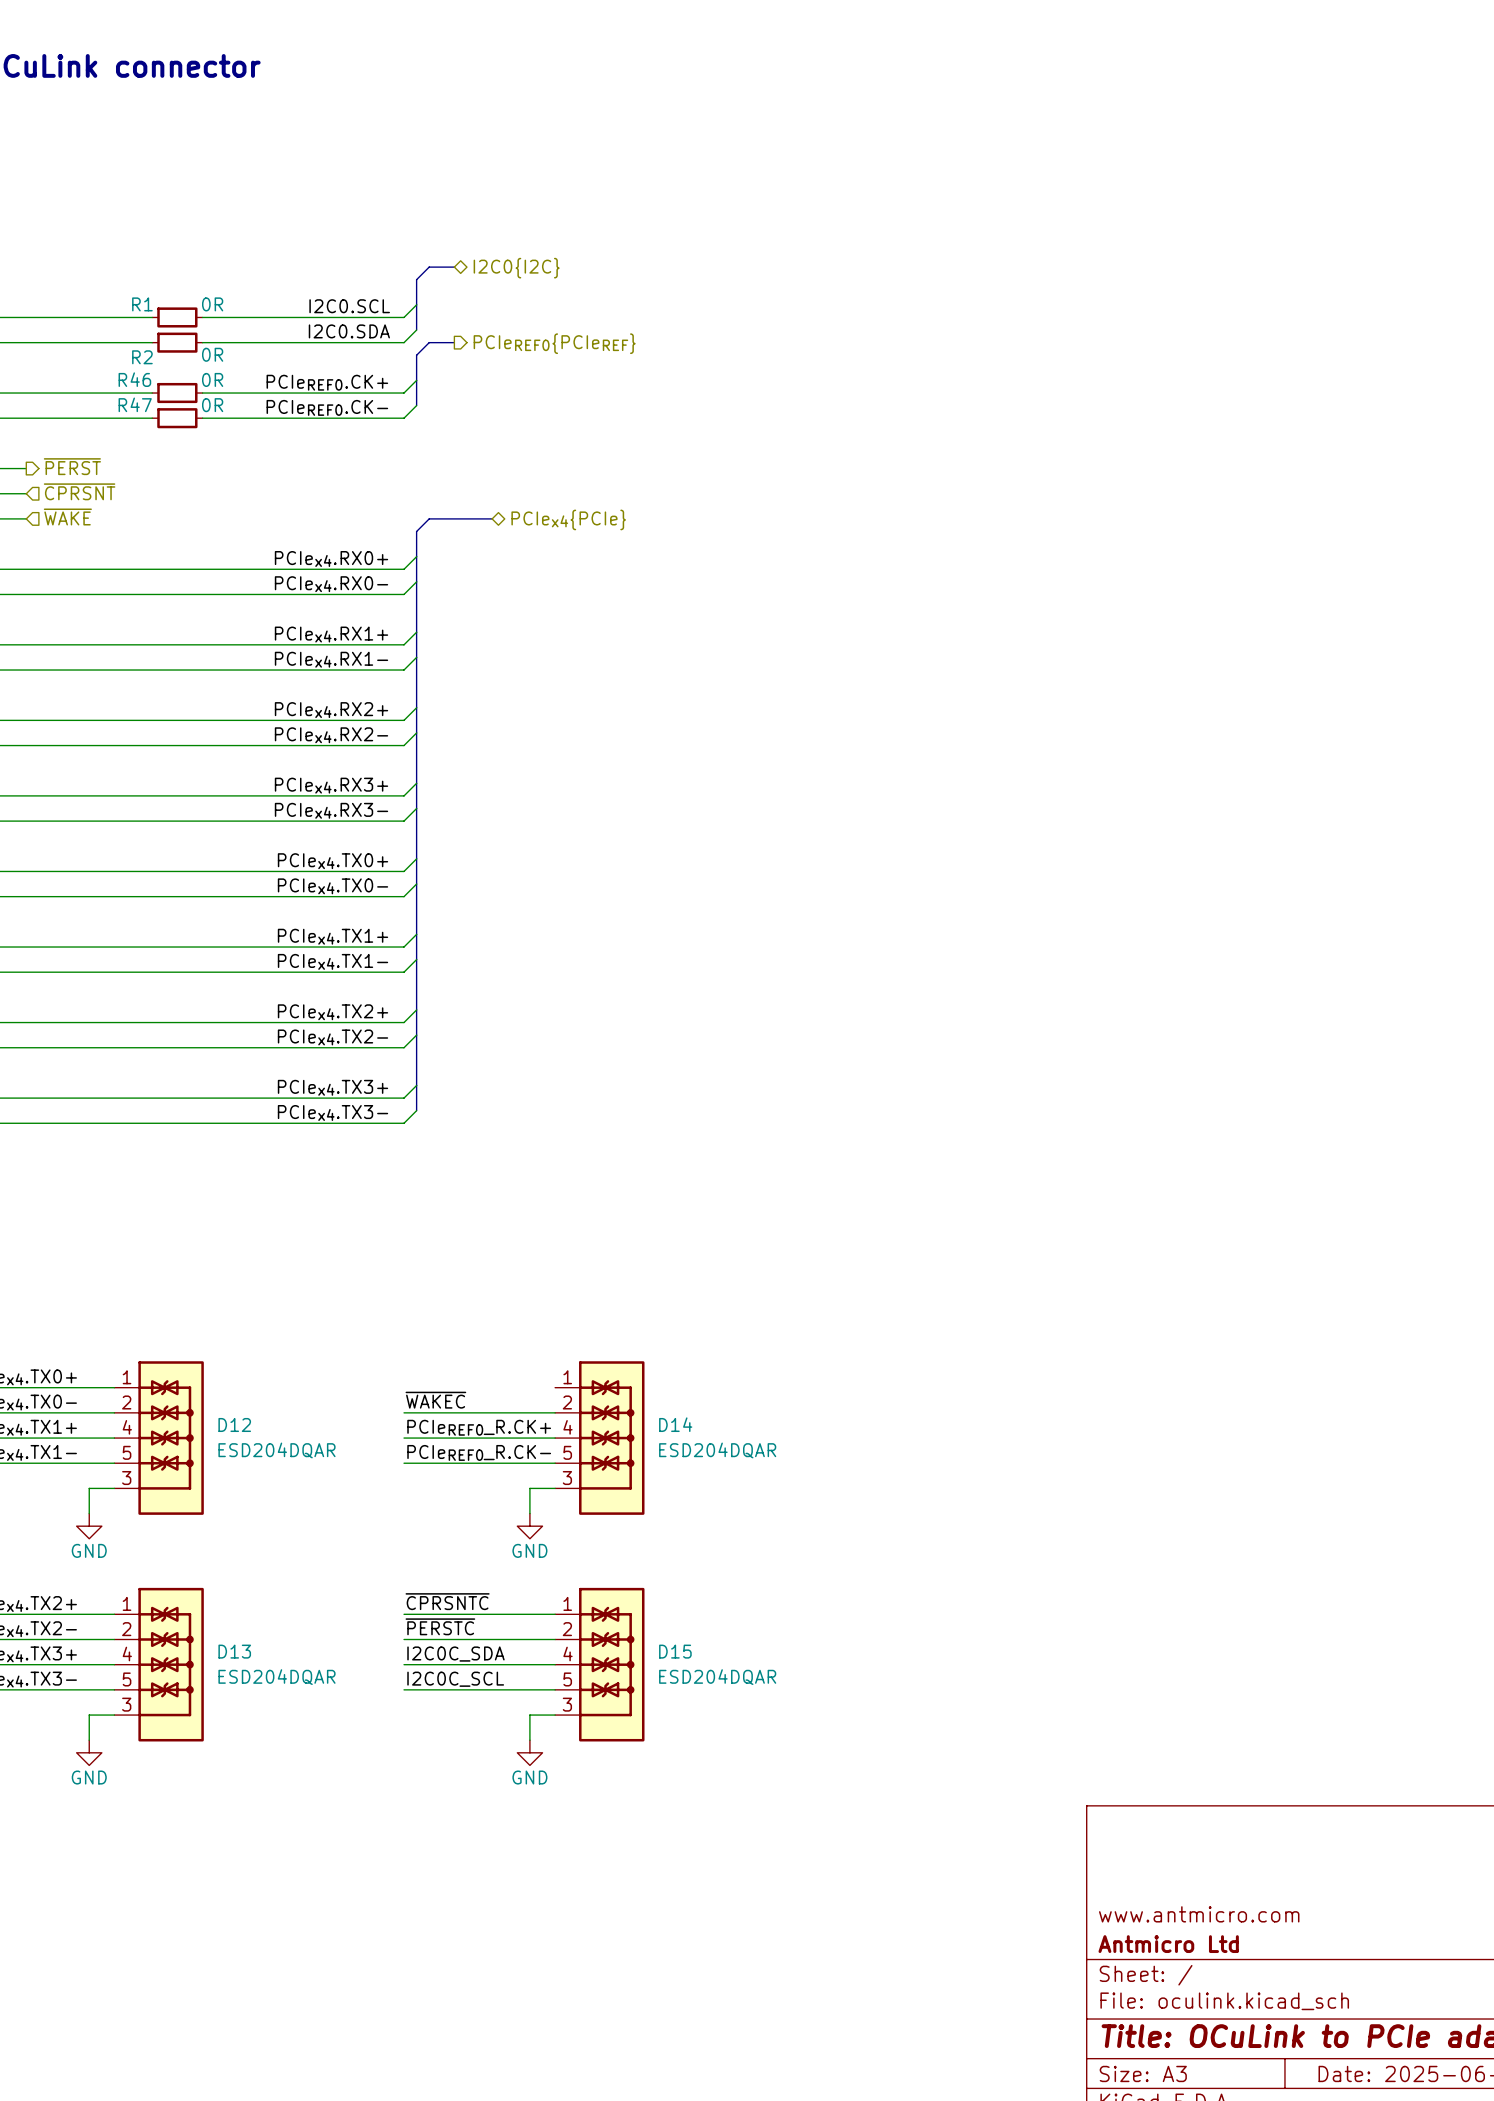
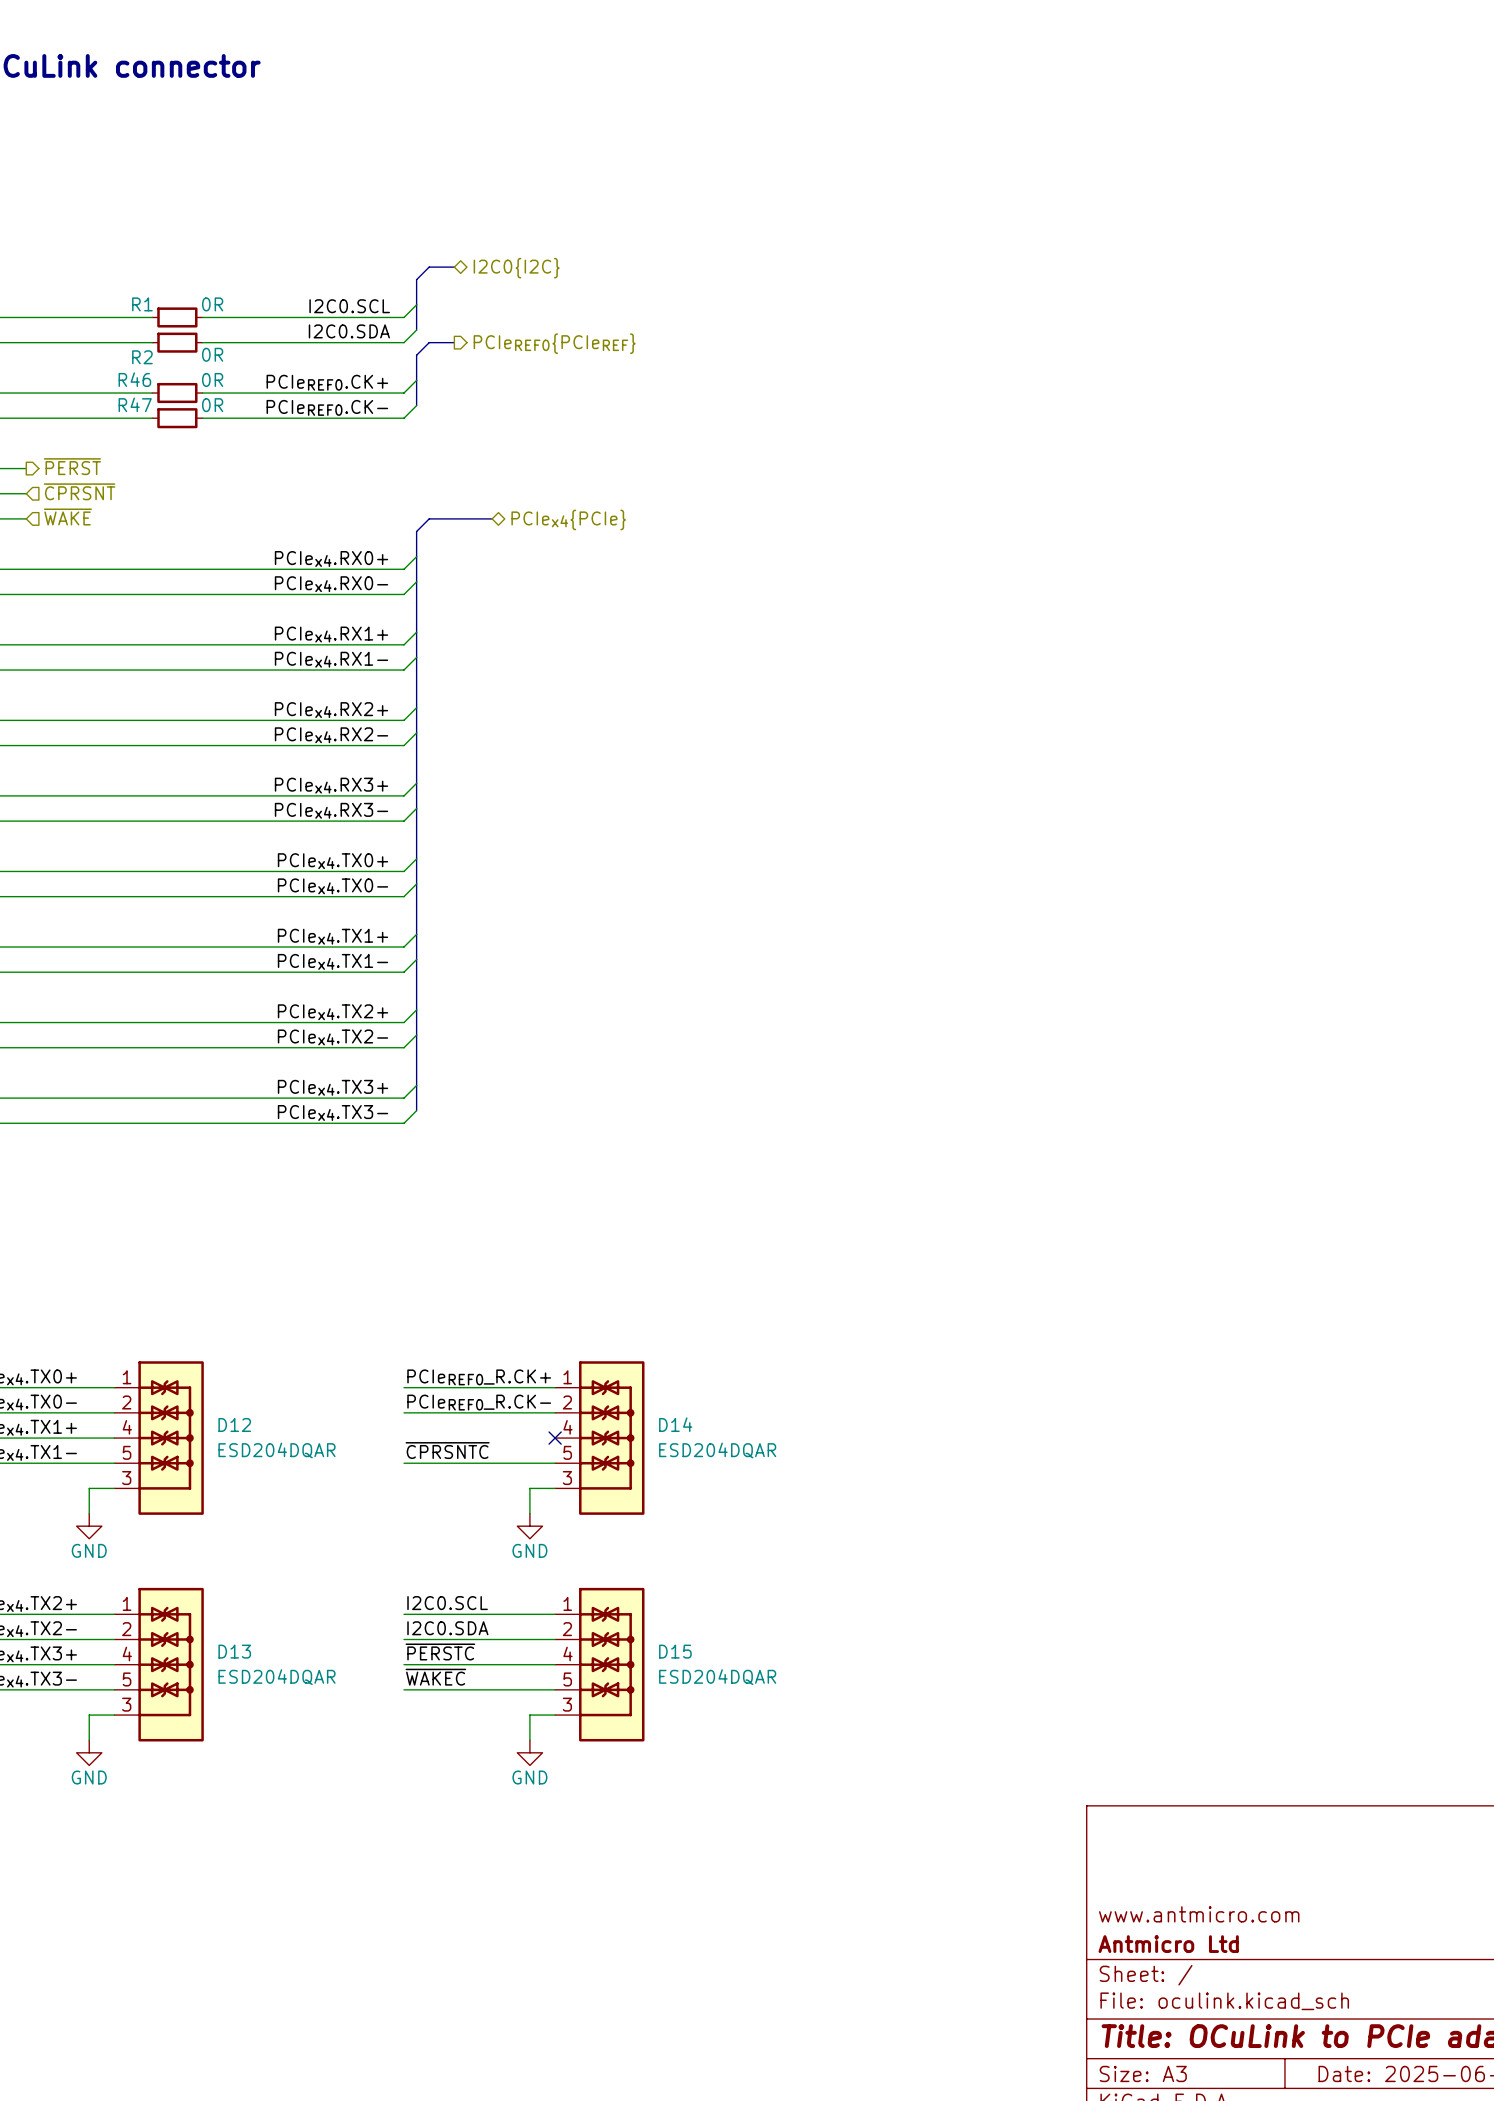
label: ~{WAKEC} (435, 1400) -> PCIeREF0_R.CK- (479, 1402)
label position: PCIeREF0_R.CK+ (479, 1427) -> PCIeREF0_R.CK+ (479, 1377)
wire: (404, 1438) (555, 1438) -> (404, 1387) (555, 1387)
no-connect mark: none -> (555, 1438)
label: PCIeREF0_R.CK- (479, 1452) -> ~{CPRSNTC} (447, 1450)
label: ~{CPRSNTC} (447, 1601) -> I2C0.SCL (447, 1603)
label: ~{PERSTC} (440, 1626) -> I2C0.SDA (447, 1628)
label: I2C0C_SDA (455, 1654) -> ~{PERSTC} (440, 1651)
label: I2C0C_SCL (455, 1679) -> ~{WAKEC} (435, 1677)

